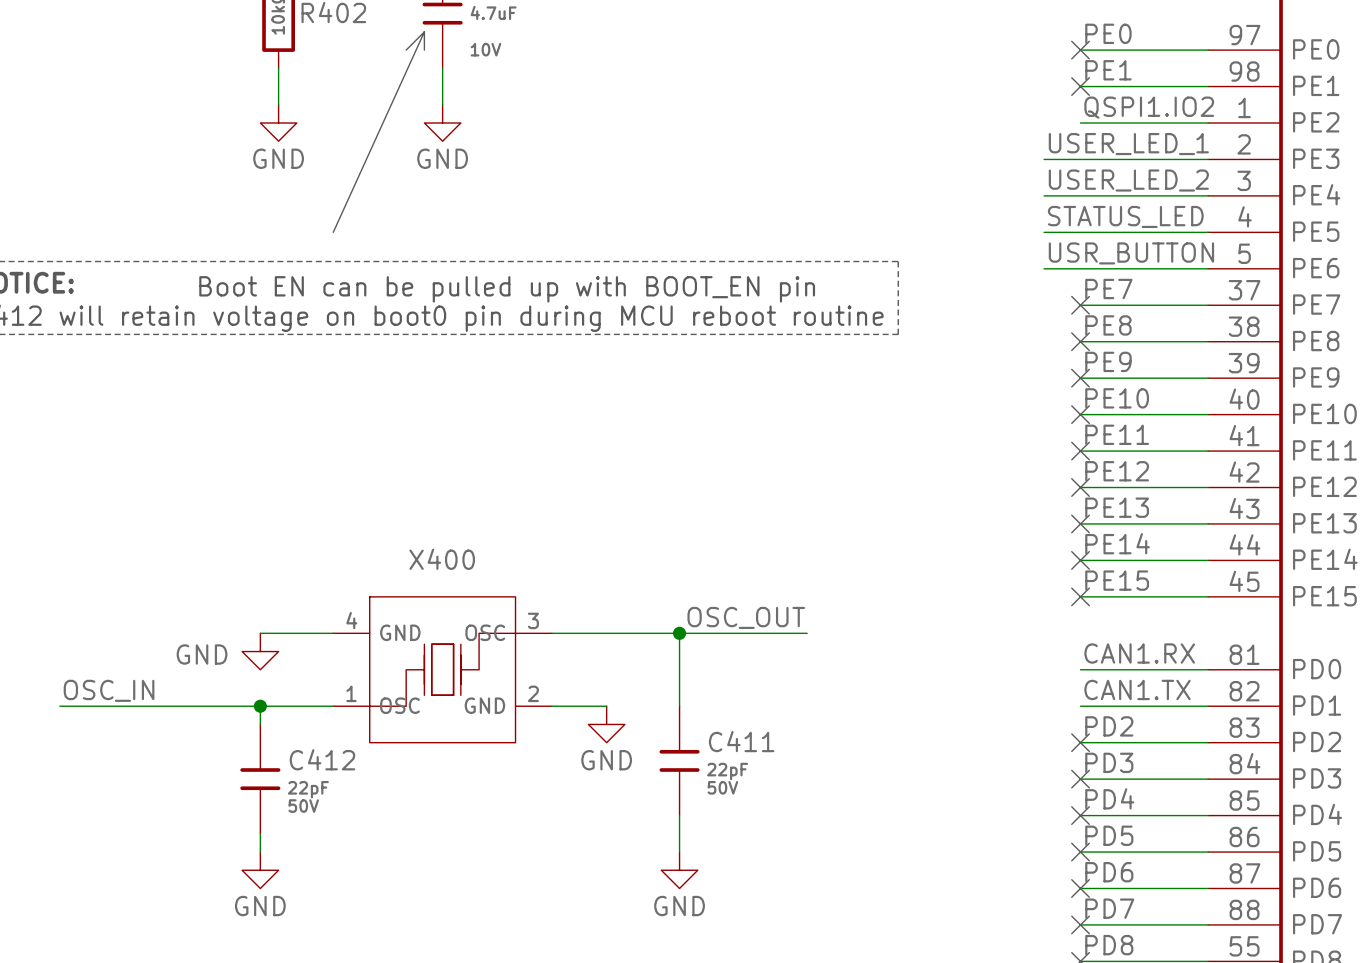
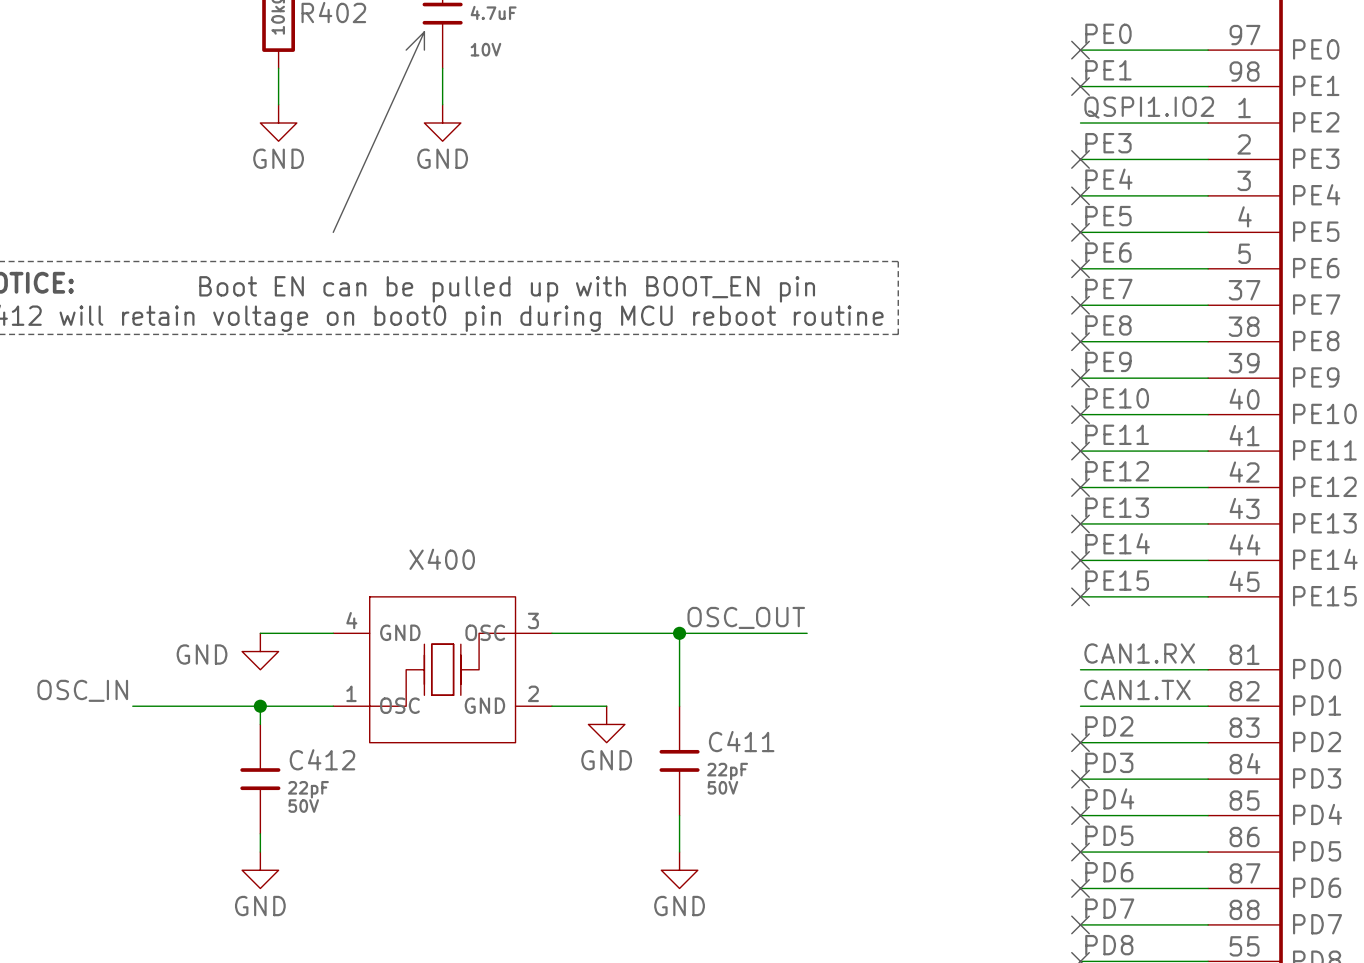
label: none -> PE3 (1108, 143)
label: USER_LED_1 (1128, 144) -> none
wire: (1044, 159) (1080, 159) -> none
no-connect mark: none -> (1080, 159)
label: none -> PE4 (1108, 179)
label: USER_LED_2 (1128, 180) -> none
wire: (1044, 195) (1080, 195) -> none
no-connect mark: none -> (1080, 195)
label: none -> PE5 (1108, 216)
label: STATUS_LED (1125, 216) -> none
wire: (1044, 232) (1080, 232) -> none
no-connect mark: none -> (1080, 232)
label: none -> PE6 (1108, 252)
label: USR_BUTTON (1131, 253) -> none
wire: (1044, 268) (1080, 268) -> none
no-connect mark: none -> (1080, 268)
label position: OSC_IN (109, 690) -> OSC_IN (82, 690)
wire: (59, 706) (132, 706) -> none

